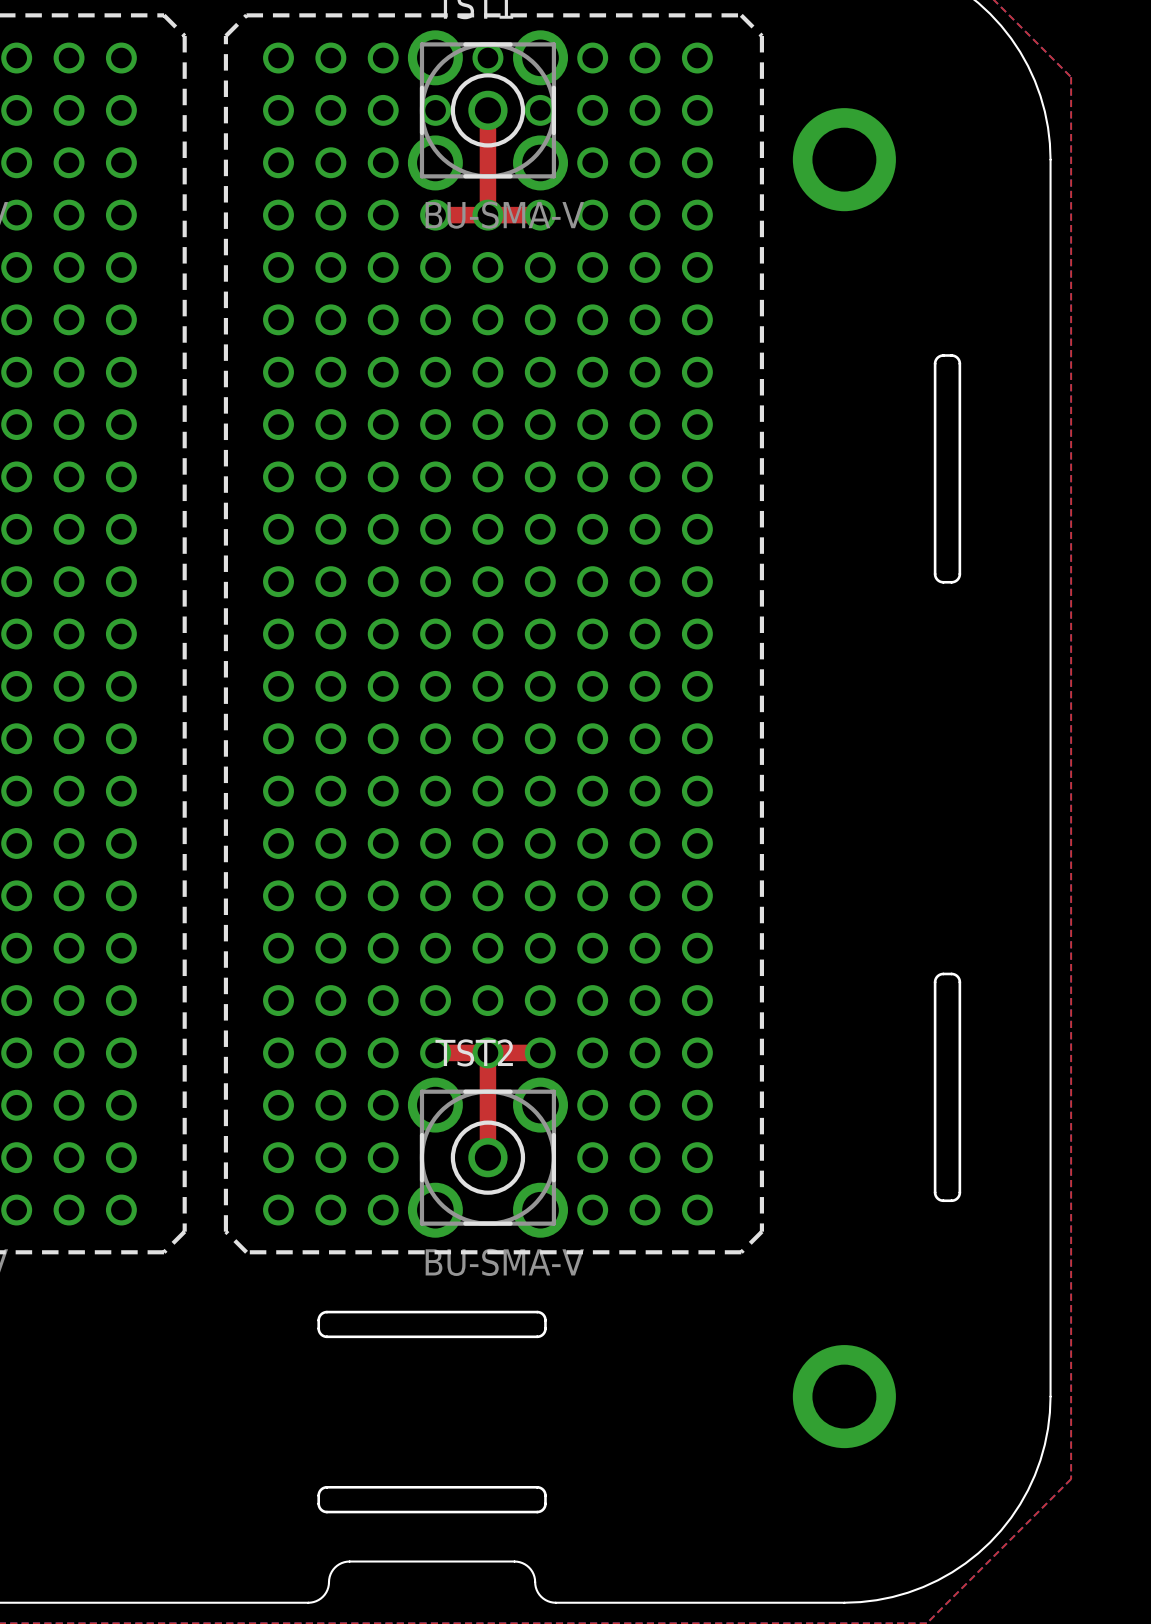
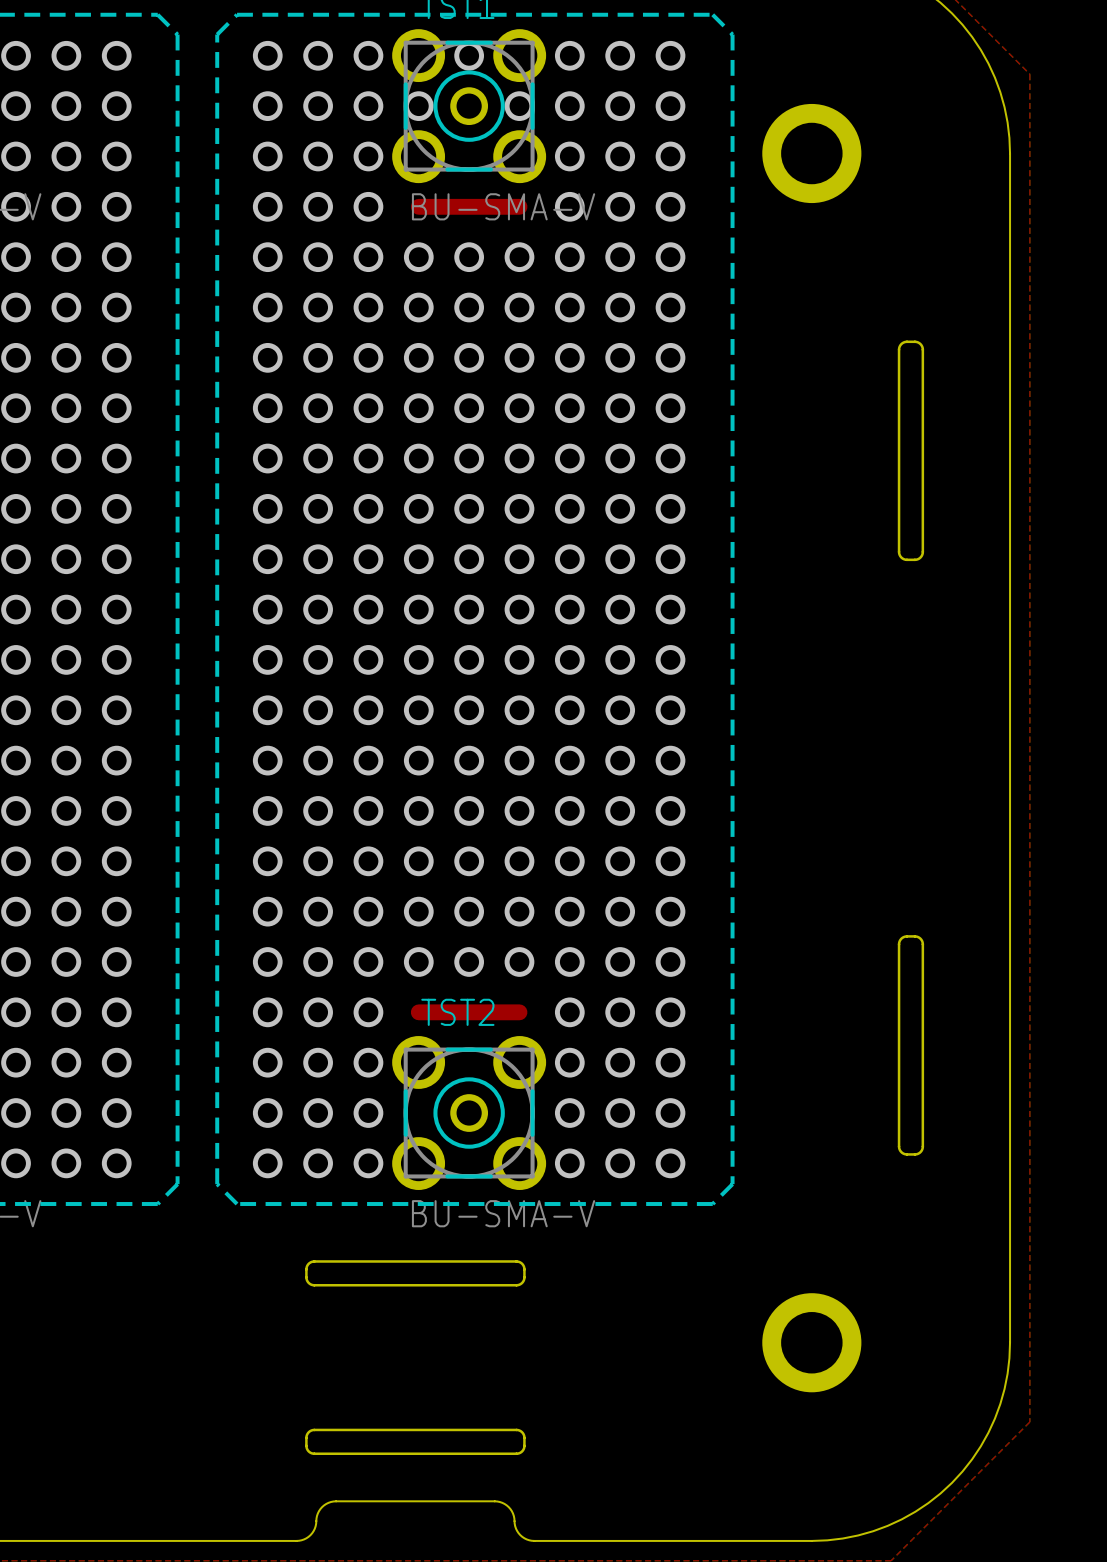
top track: (487, 110) (487, 215) -> none
via: (435, 215) -> none
via: (487, 215) -> none
via: (540, 215) -> none
via: (435, 1052) -> none
top track: (487, 1052) (487, 1157) -> none
via: (487, 1052) -> none
via: (540, 1052) -> none

